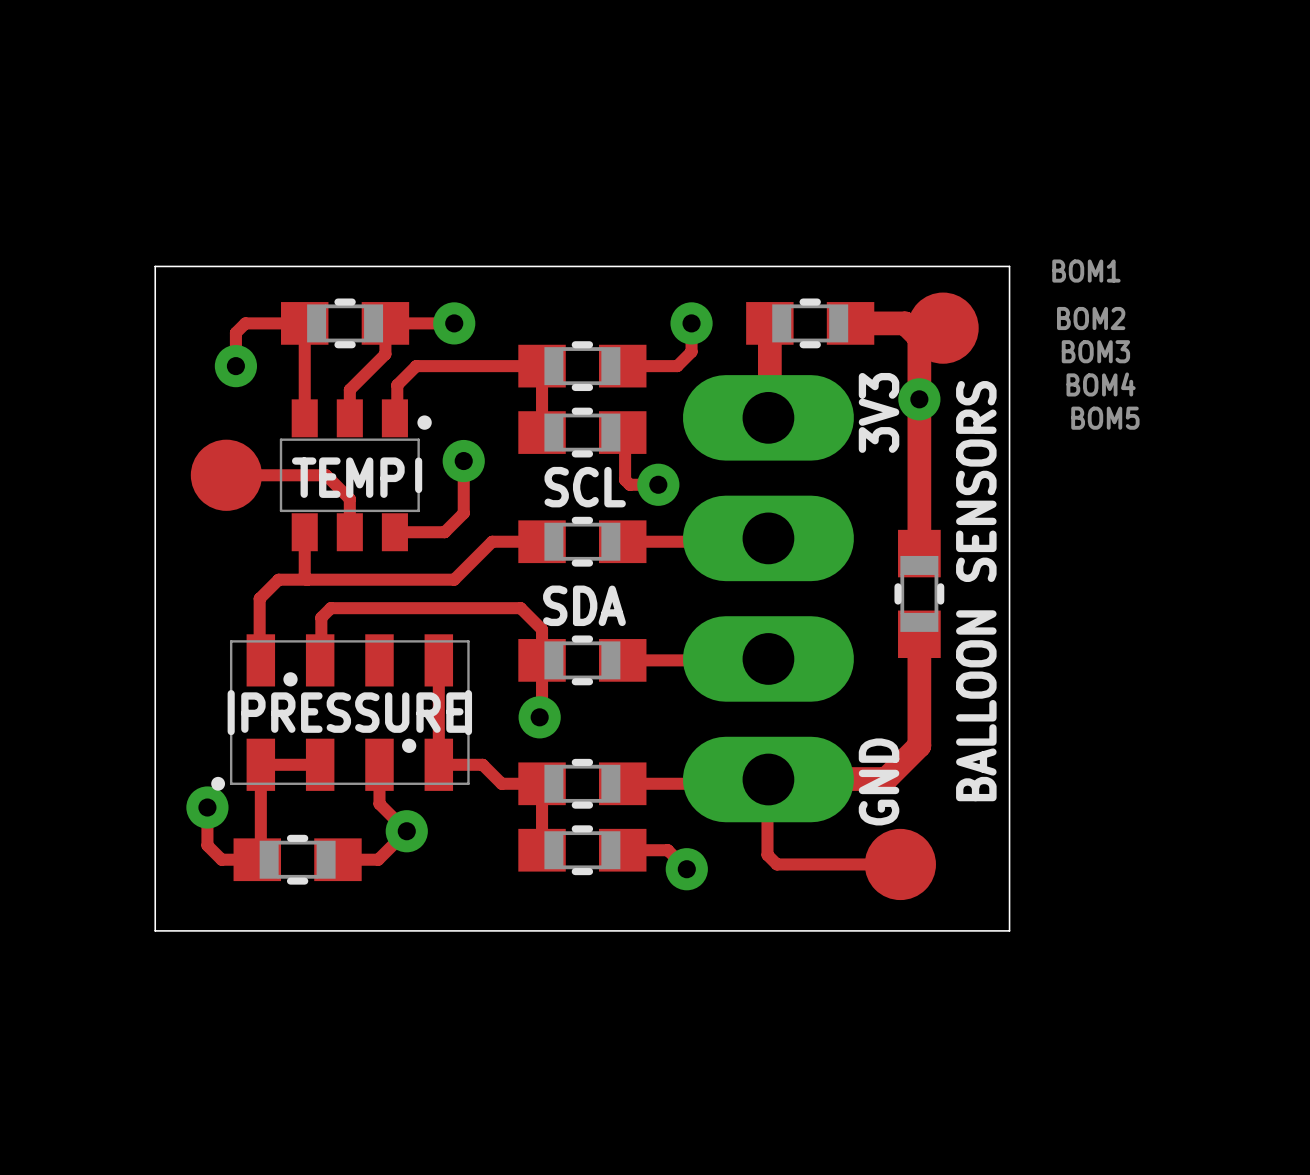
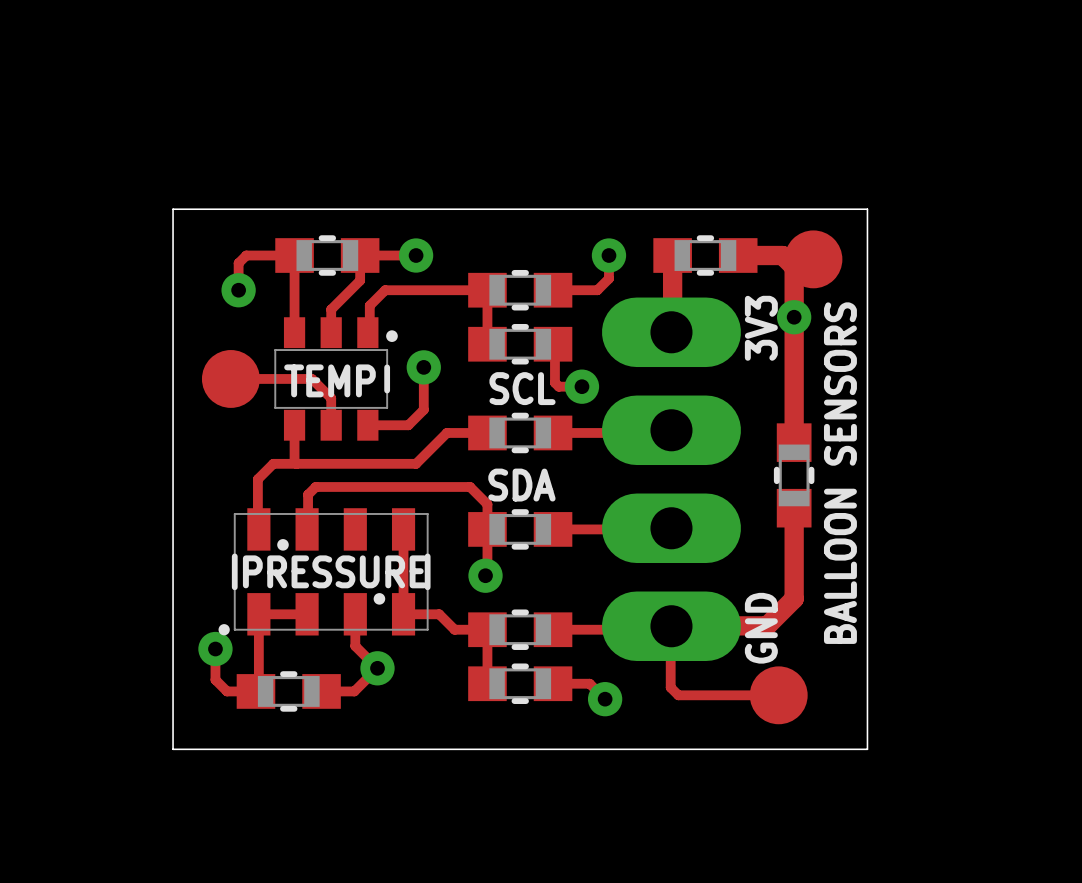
BOM1: (1086, 271) -> none
BOM2: (1091, 318) -> none
BOM3: (1095, 351) -> none
BOM4: (1101, 384) -> none
BOM5: (1105, 418) -> none

